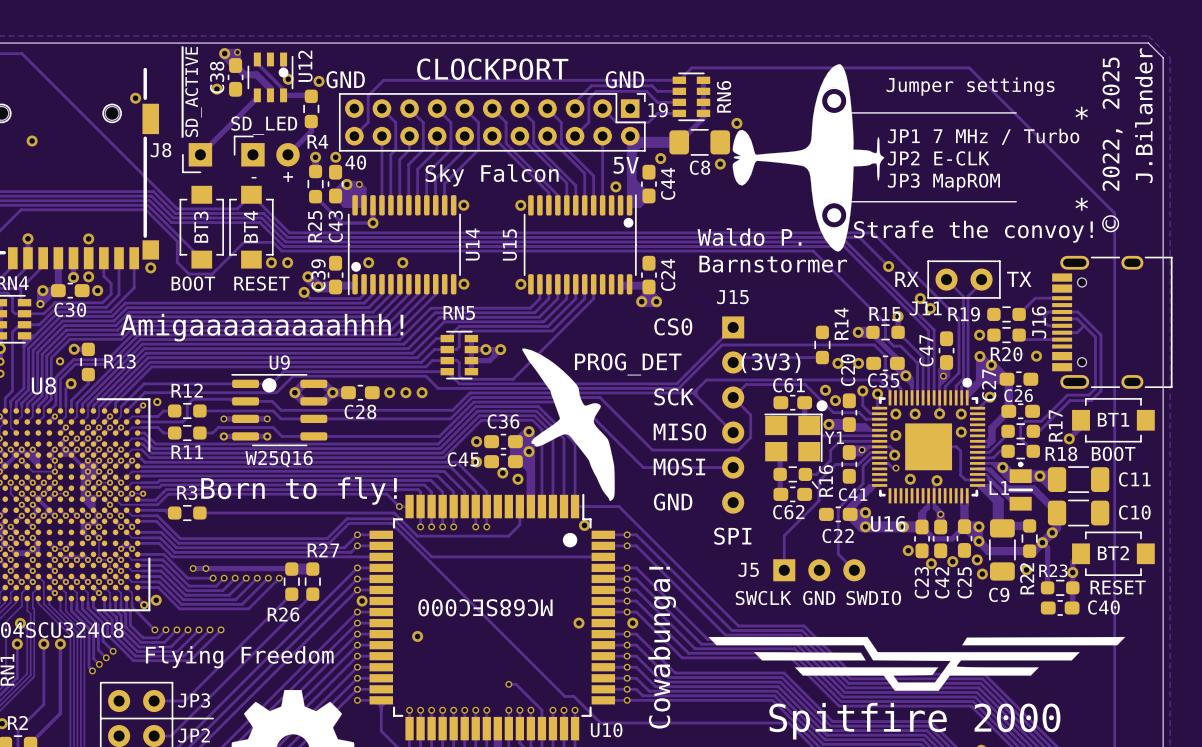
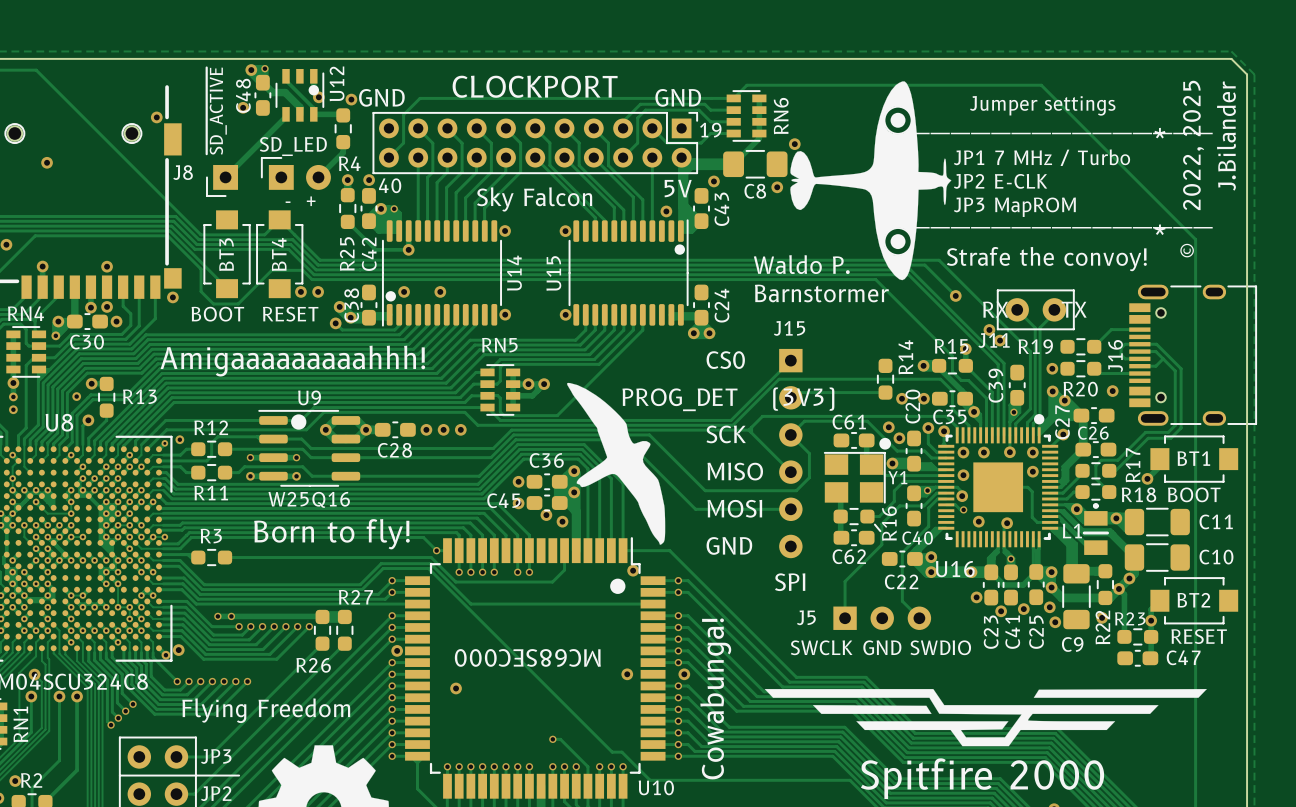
C38 name: C38 (217, 77) -> C48 (243, 95)
C44 name: C44 (668, 183) -> C43 (721, 209)
C43 name: C43 (335, 226) -> C42 (369, 254)
C39 name: C39 (318, 275) -> C38 (351, 305)
C47 name: C47 (926, 350) -> C39 (995, 385)
C41 name: C41 (853, 494) -> C40 (917, 538)
C42 name: C42 (942, 582) -> C41 (1012, 632)
C40 name: C40 (1103, 607) -> C47 (1183, 657)

